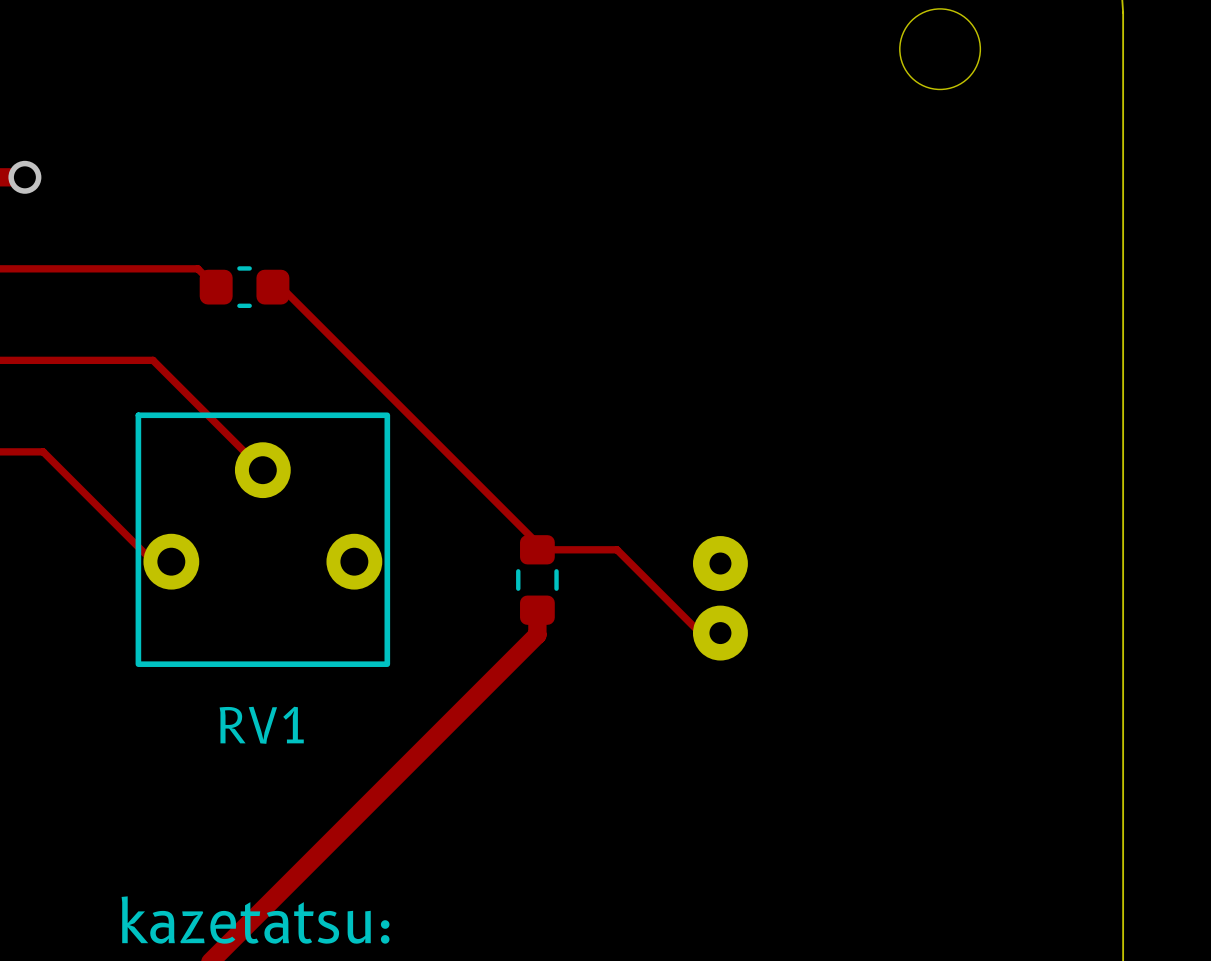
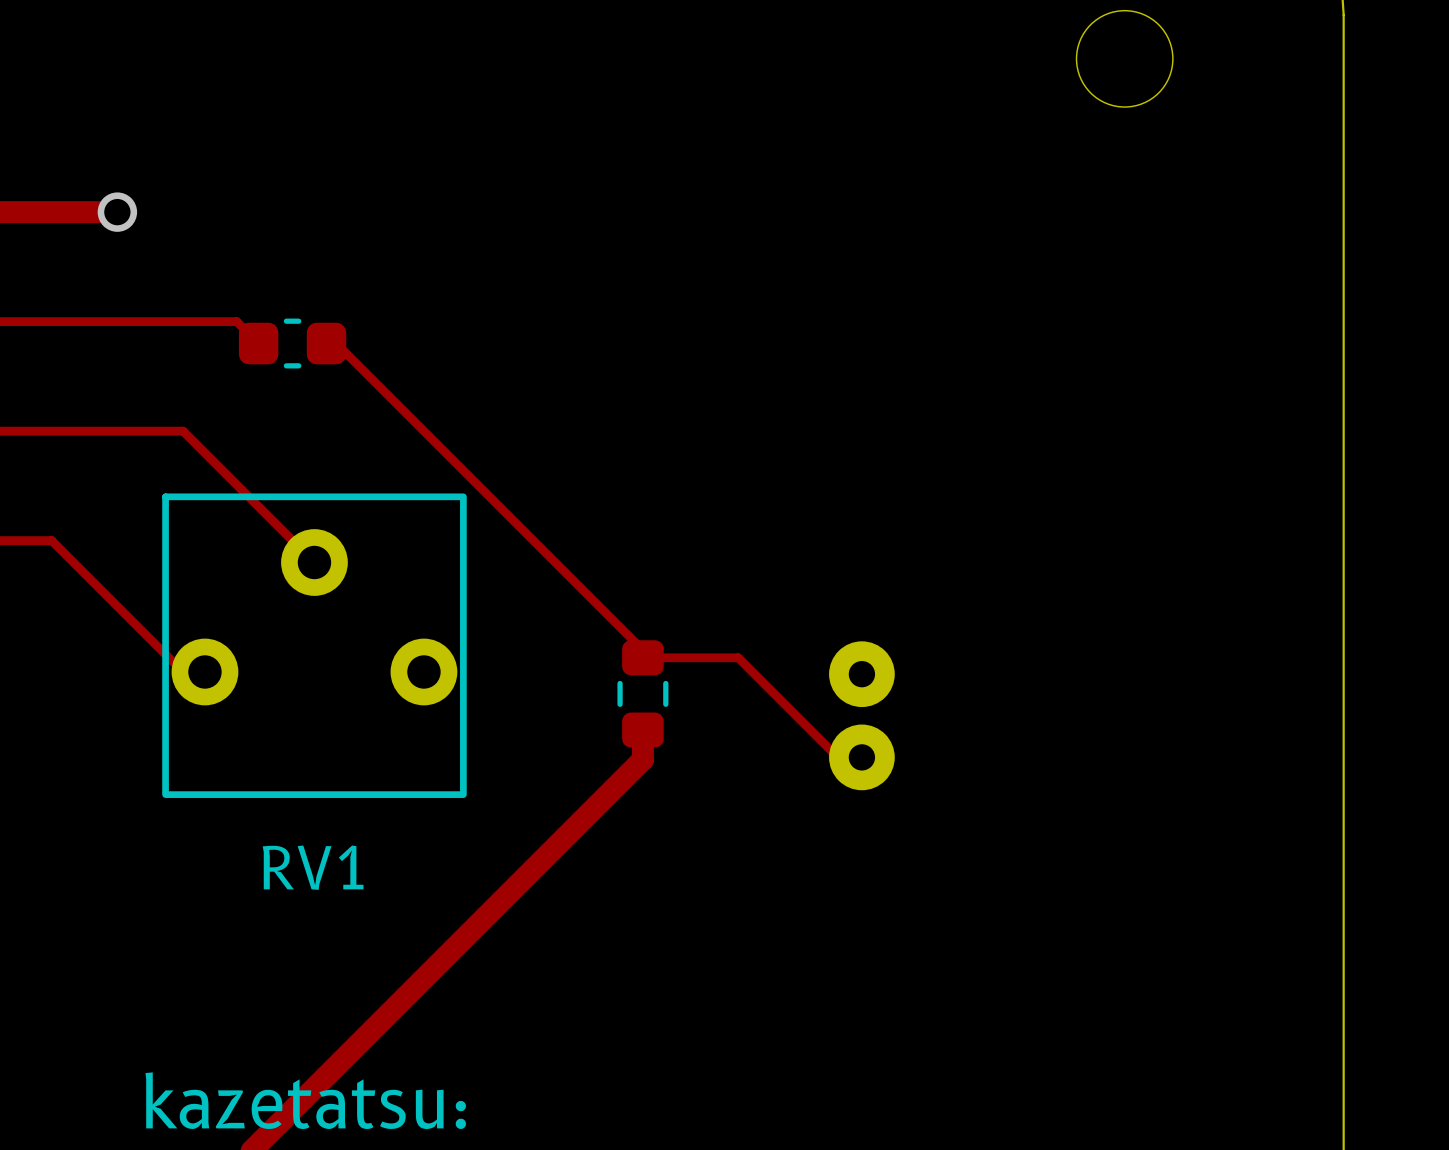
top track: none -> (29, 212) (117, 212)
via position: (24, 177) -> (117, 212)

